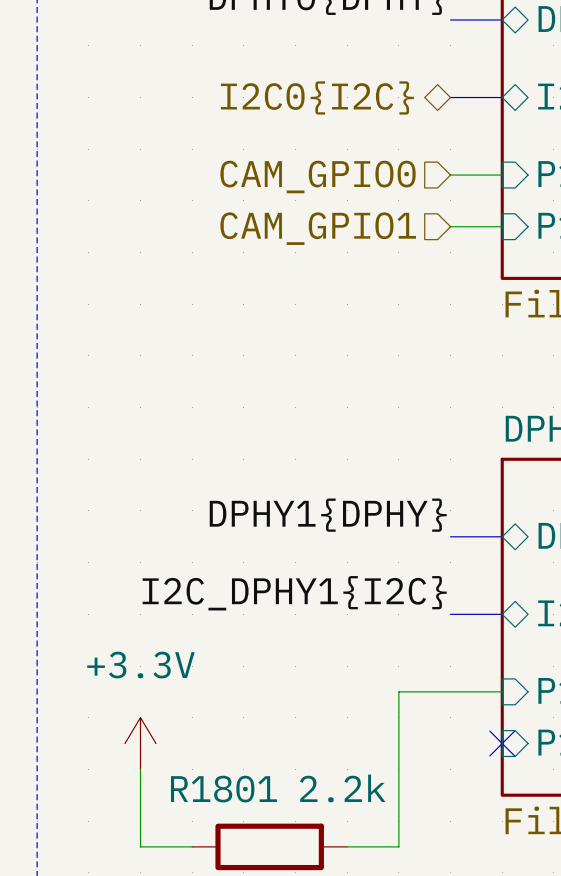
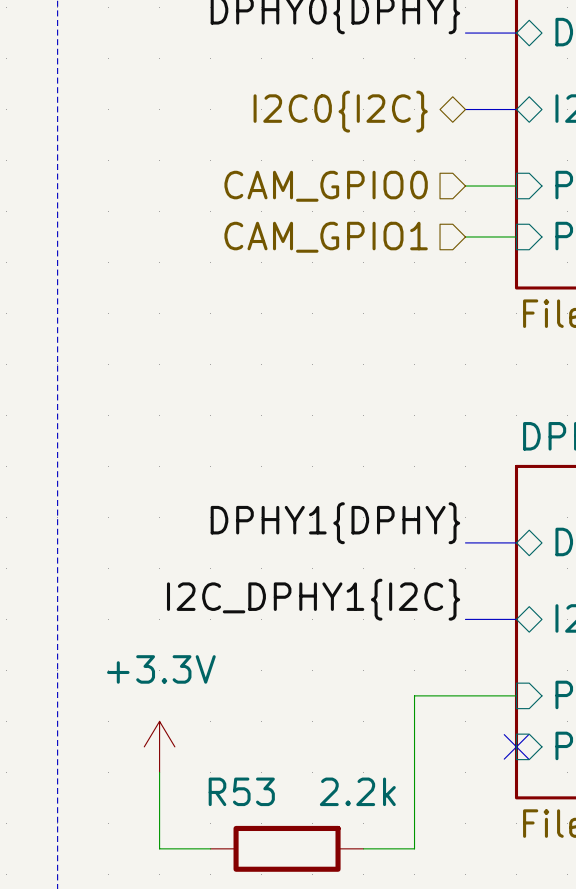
R1801 name: R1801 (223, 789) -> R53 (241, 791)

